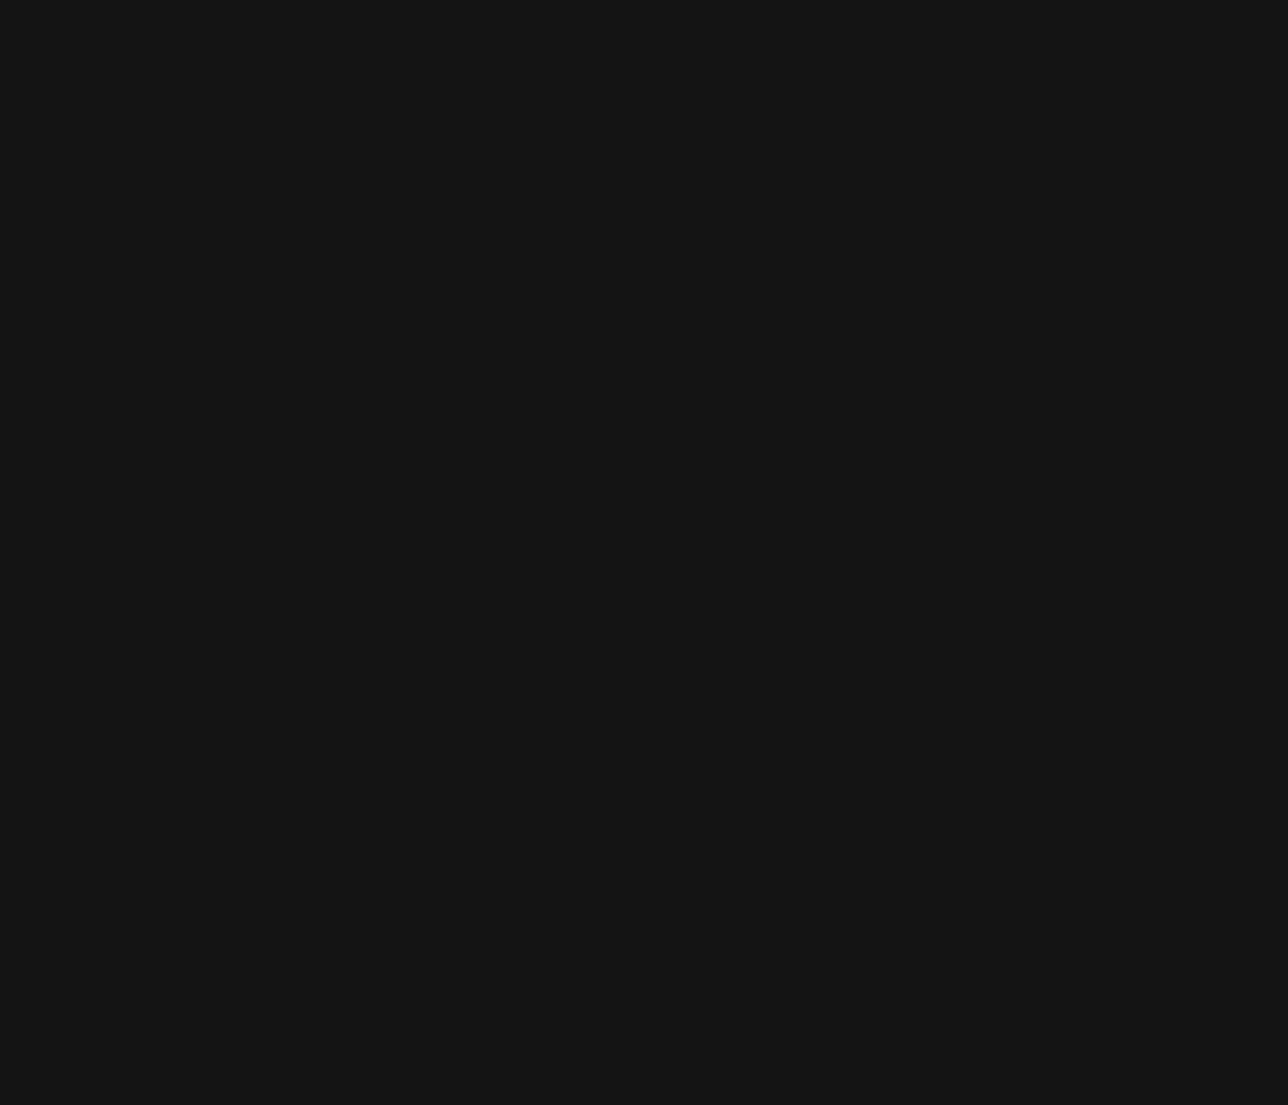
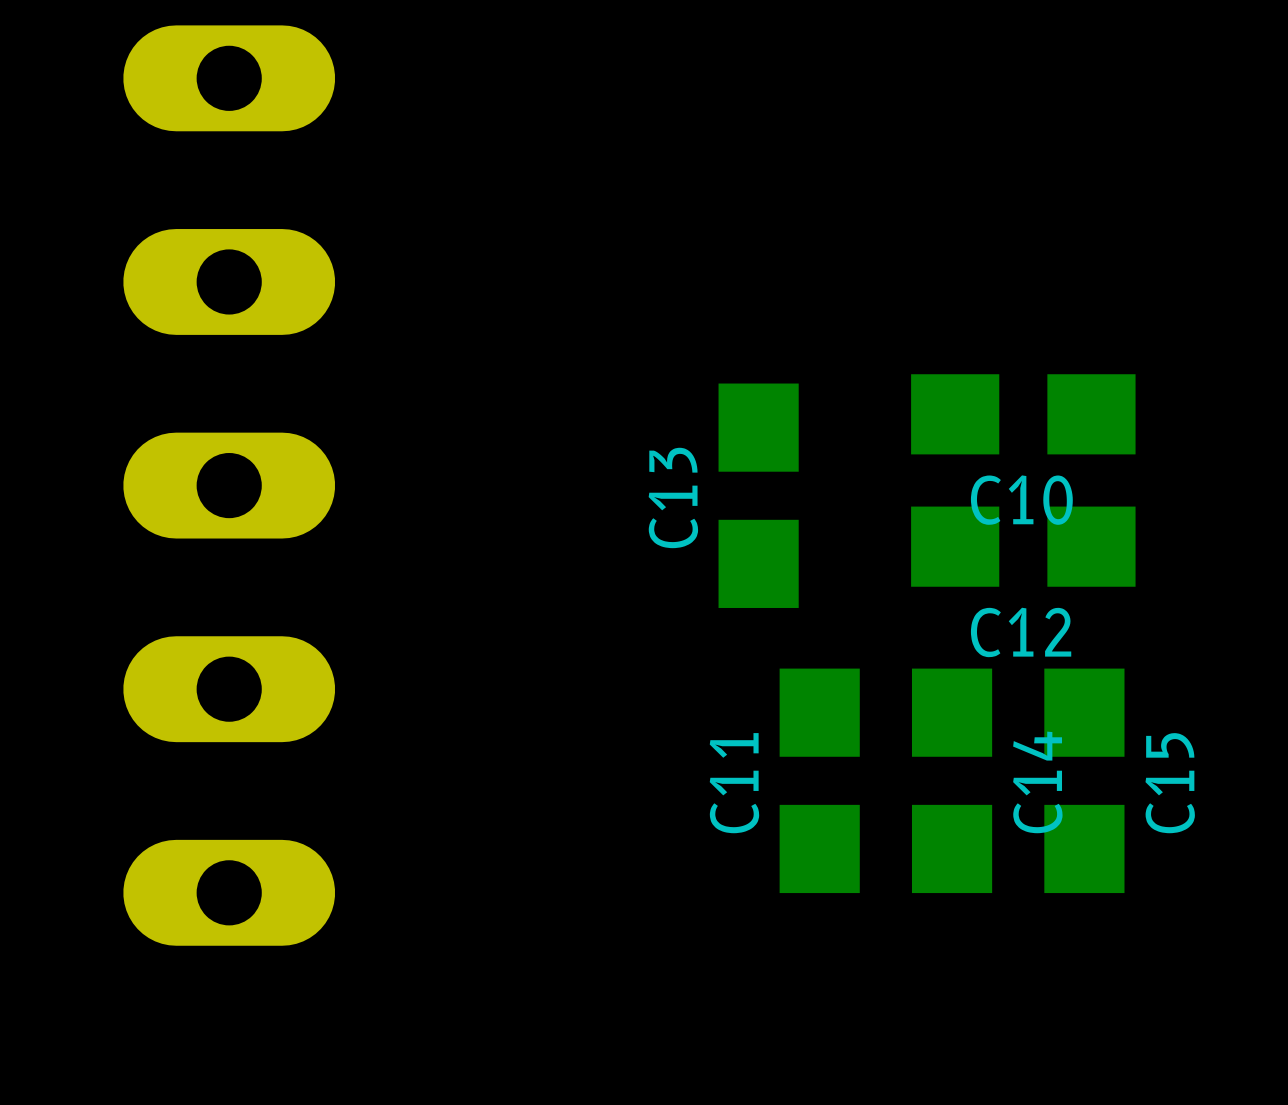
C10: none -> (1023, 414)
part: none -> (229, 485)
C13: none -> (758, 495)
C12: none -> (1023, 546)
C11: none -> (819, 780)
C14: none -> (952, 780)
C15: none -> (1084, 780)

